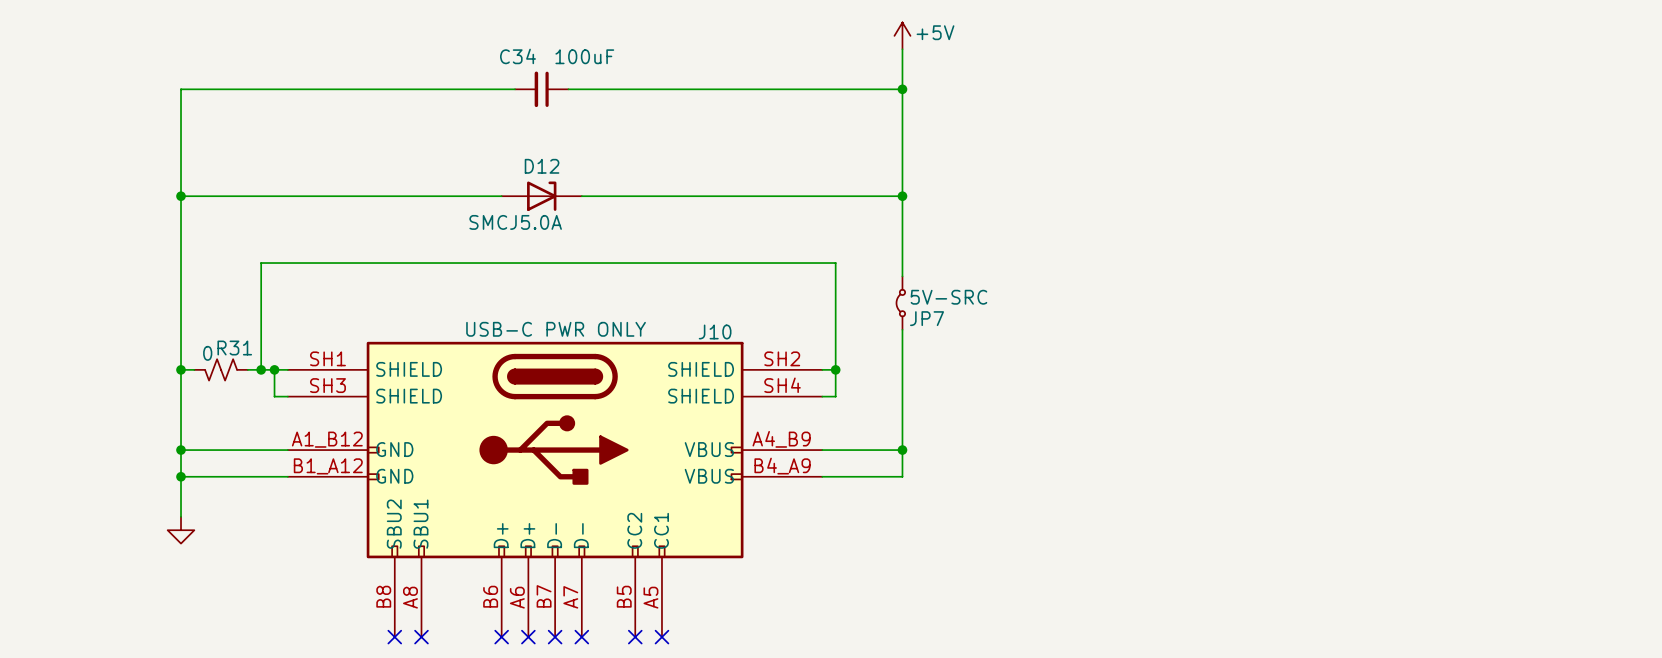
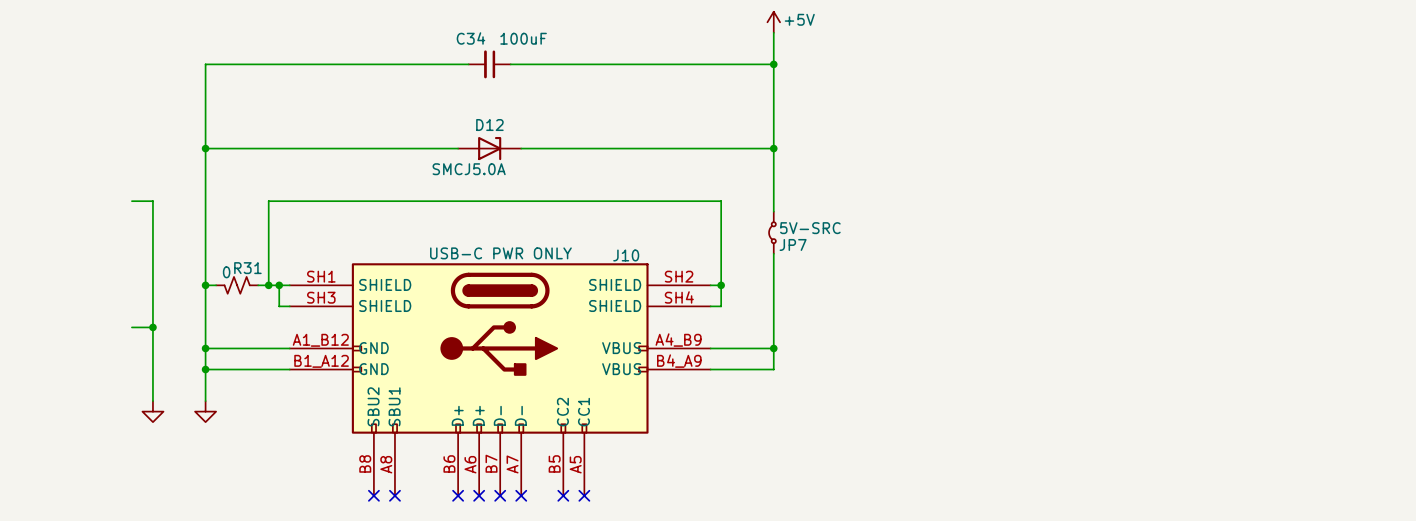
wire: none -> (131, 201) (152, 201) (152, 401)
wire: none -> (131, 327) (152, 327)
junction: none -> (152, 327)
power symbol: none -> (152, 411)

